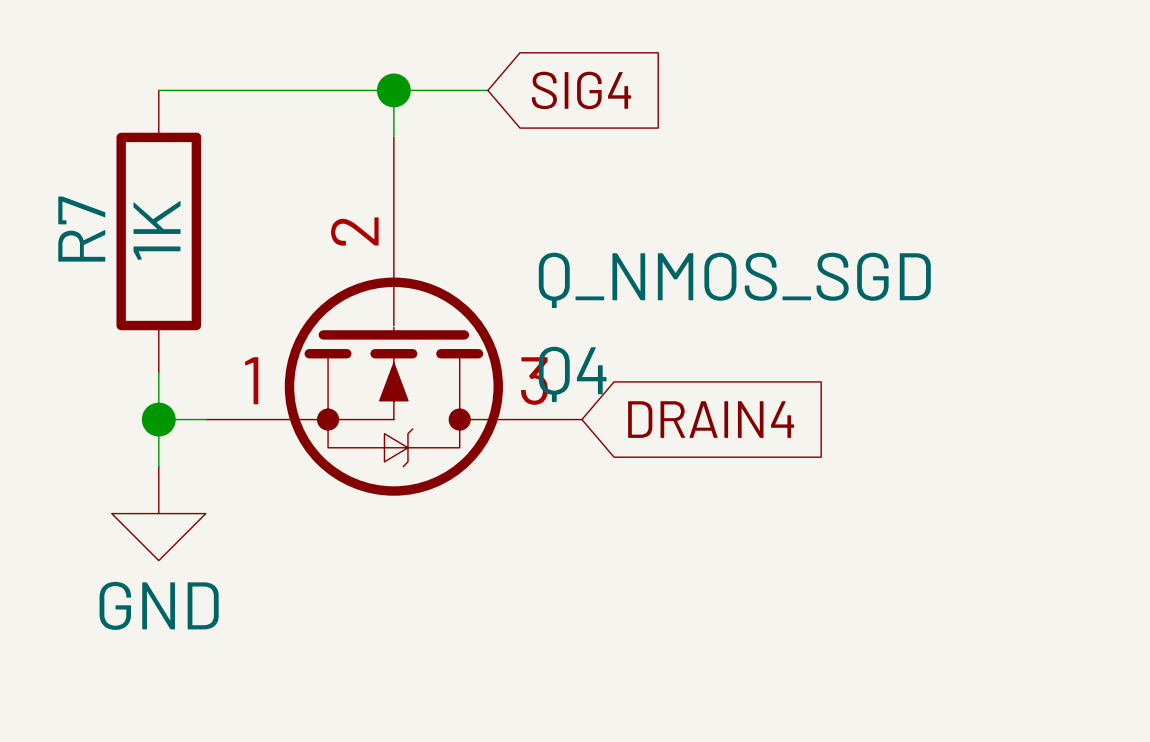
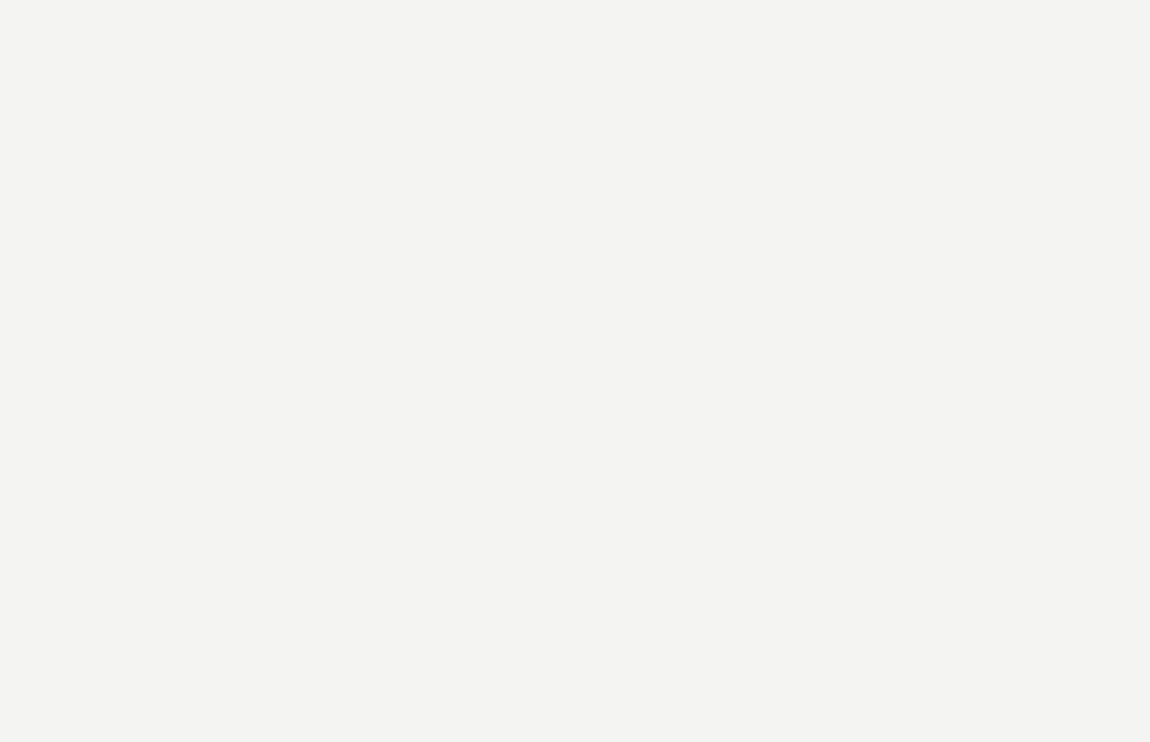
wire: (158, 90) (487, 90) -> none
wire: (393, 90) (393, 137) -> none
junction: (393, 90) -> none
global label: SIG4 (581, 90) -> none
R7: 1K (158, 231) -> none
Q4: Q_NMOS_SGD (393, 316) -> none
wire: (158, 372) (158, 466) -> none
wire: (158, 419) (205, 419) -> none
junction: (158, 419) -> none
global label: DRAIN4 (711, 419) -> none
power symbol: GND (158, 513) -> none

